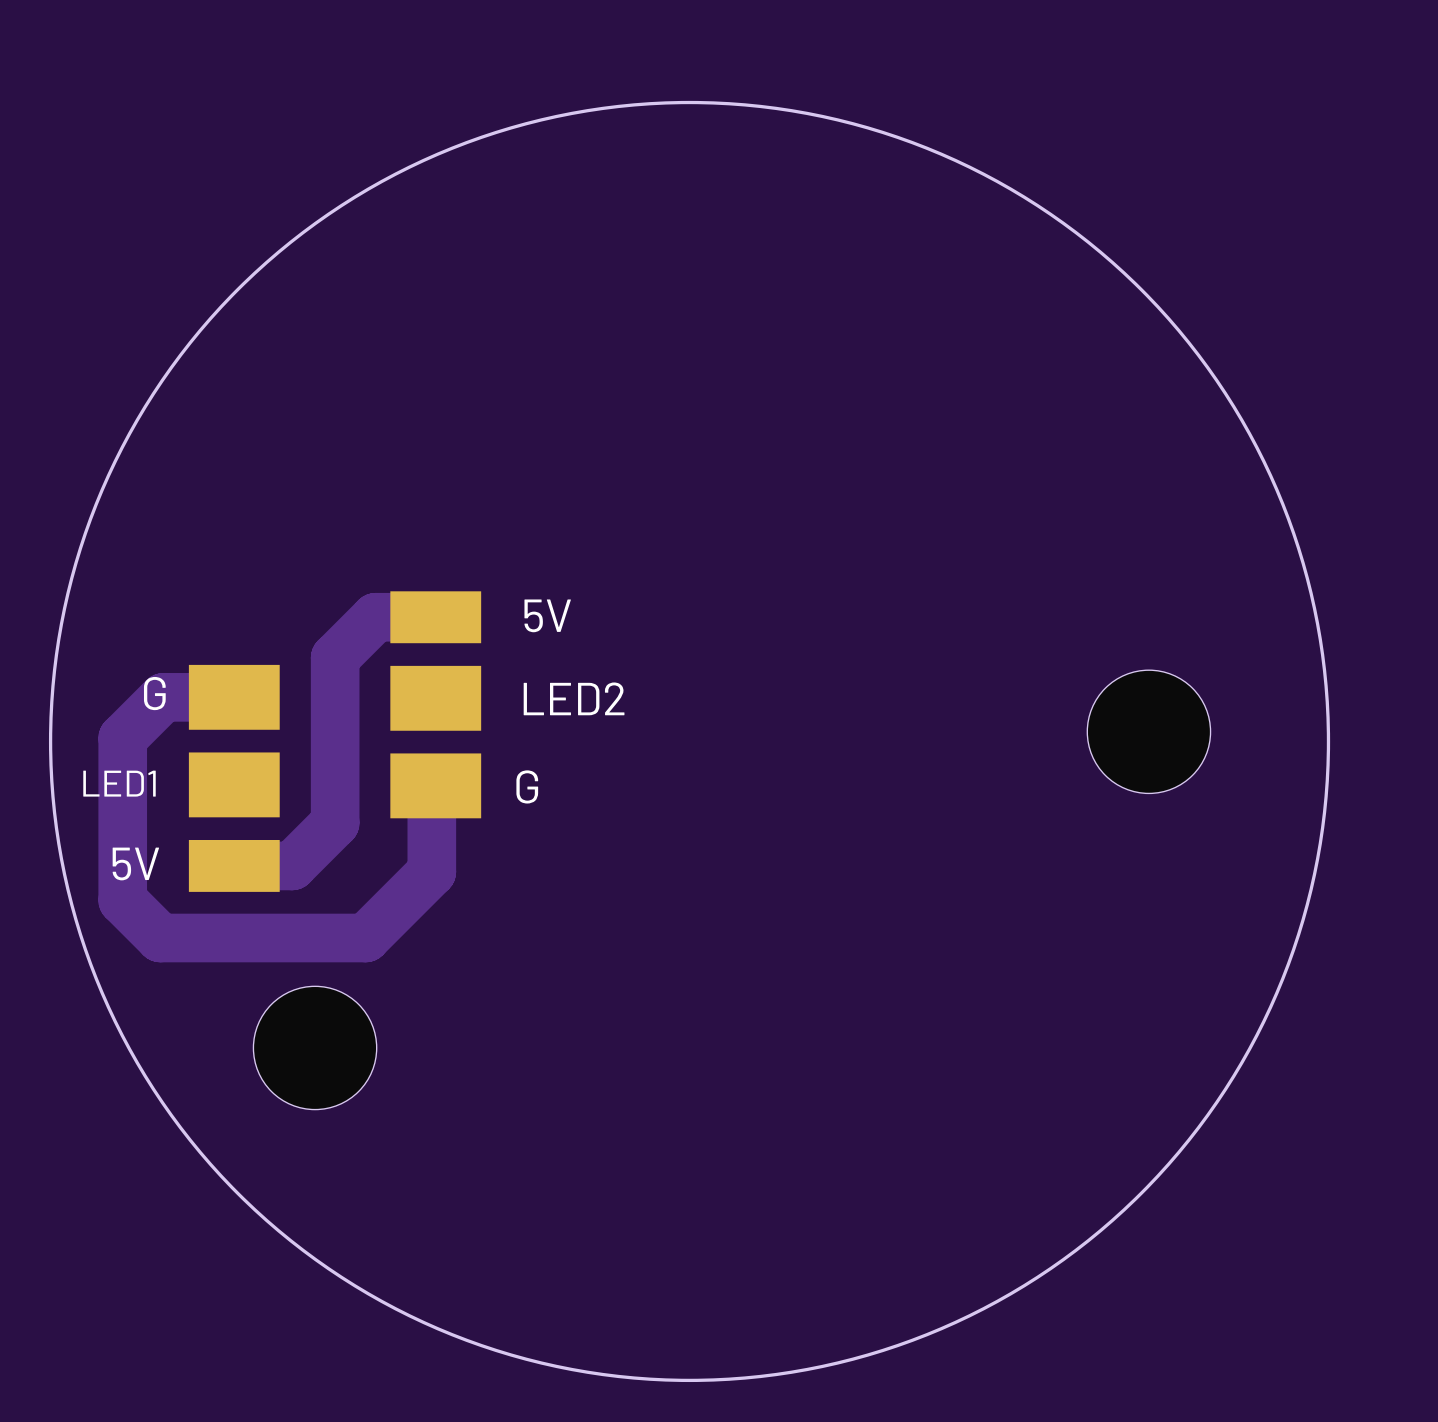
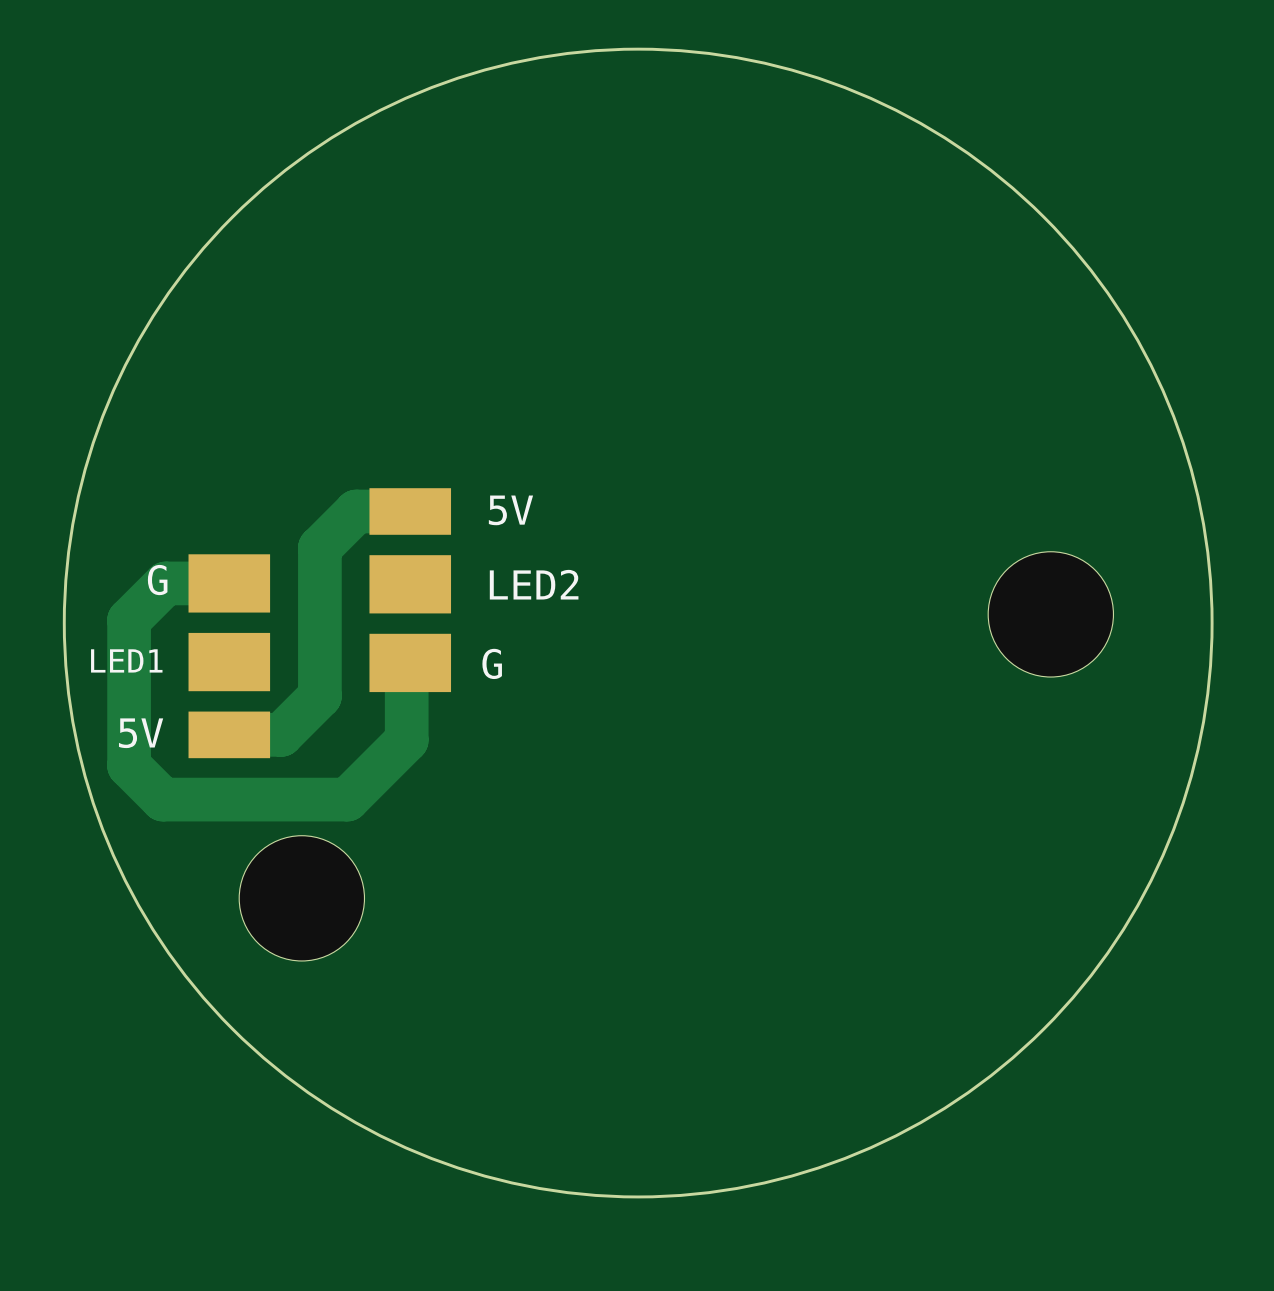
part footprint: [1087, 670, 1211, 794] -> [988, 551, 1114, 678]
part footprint: [253, 986, 377, 1110] -> [239, 835, 365, 961]

